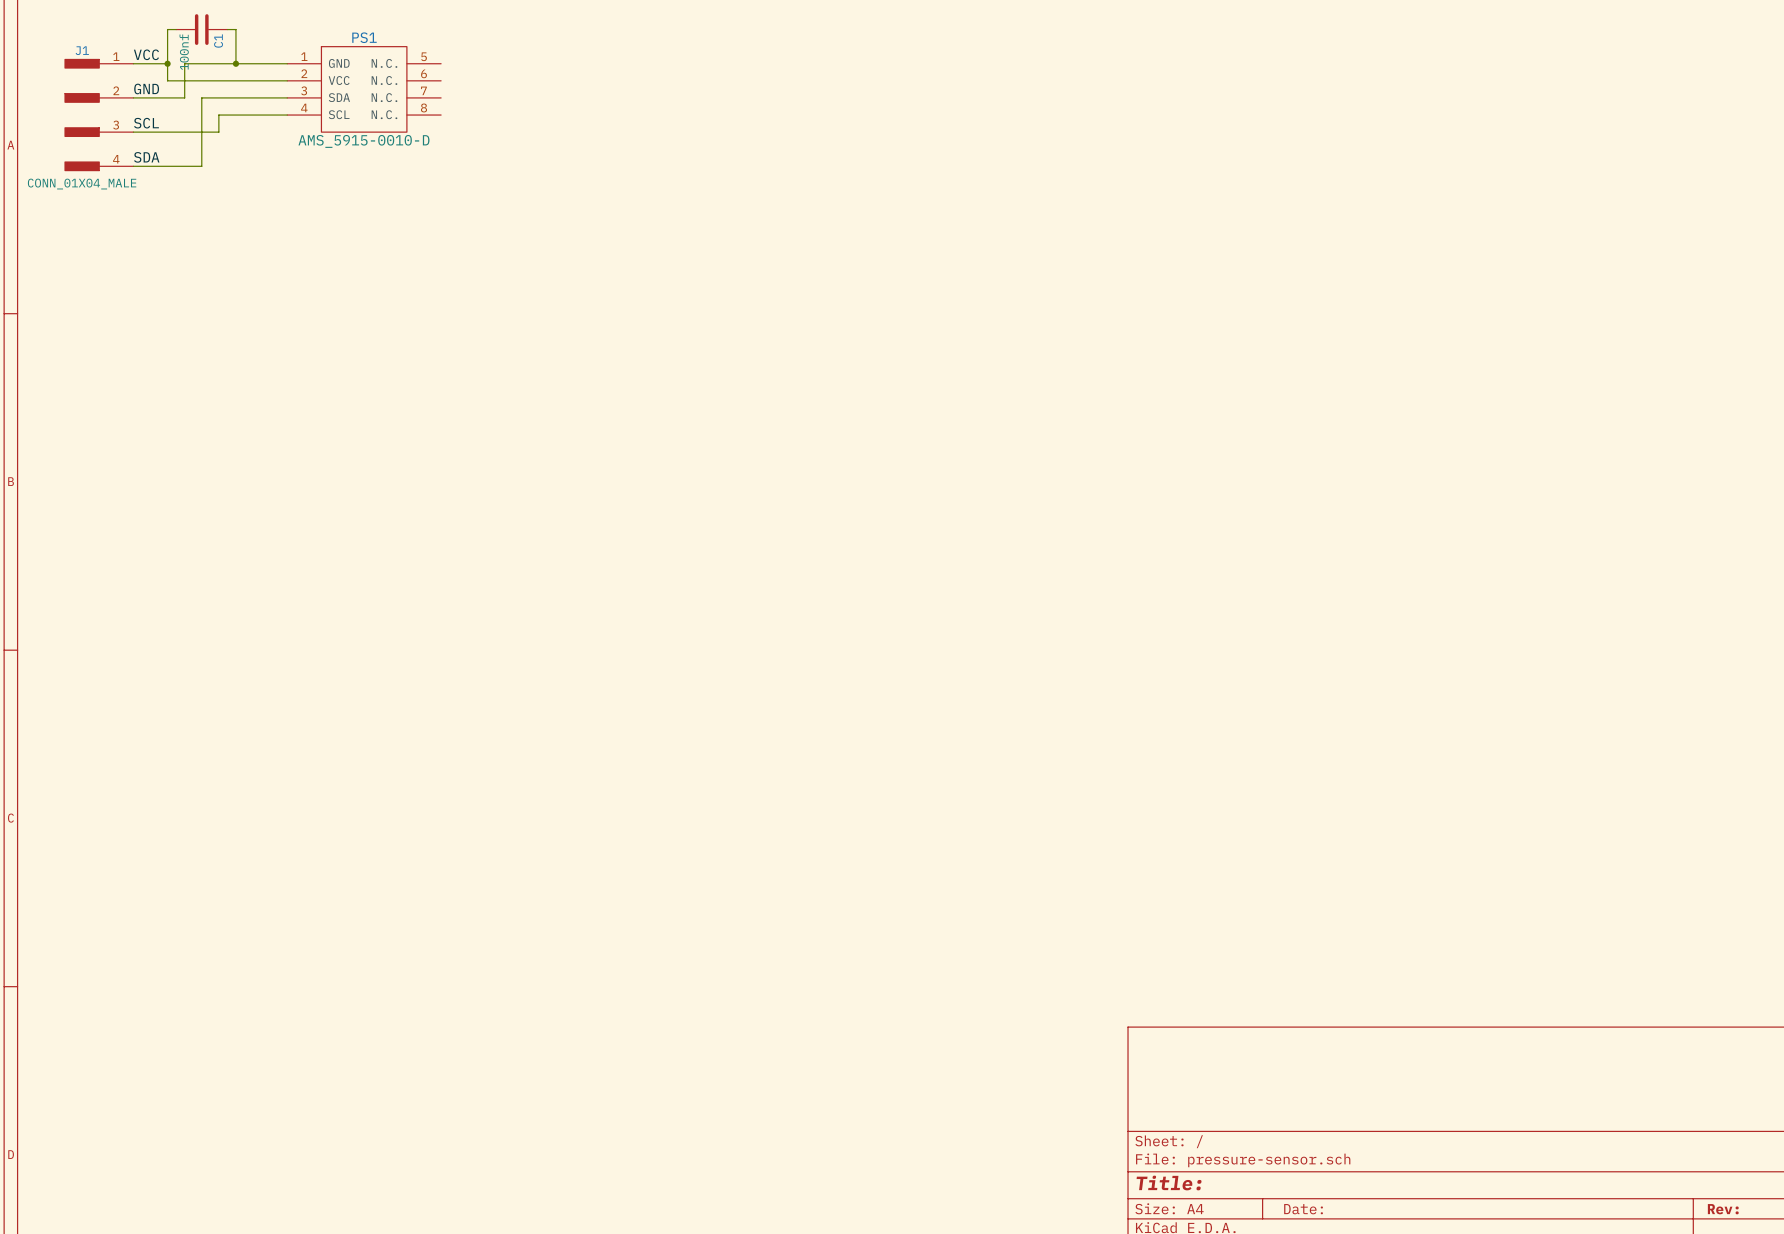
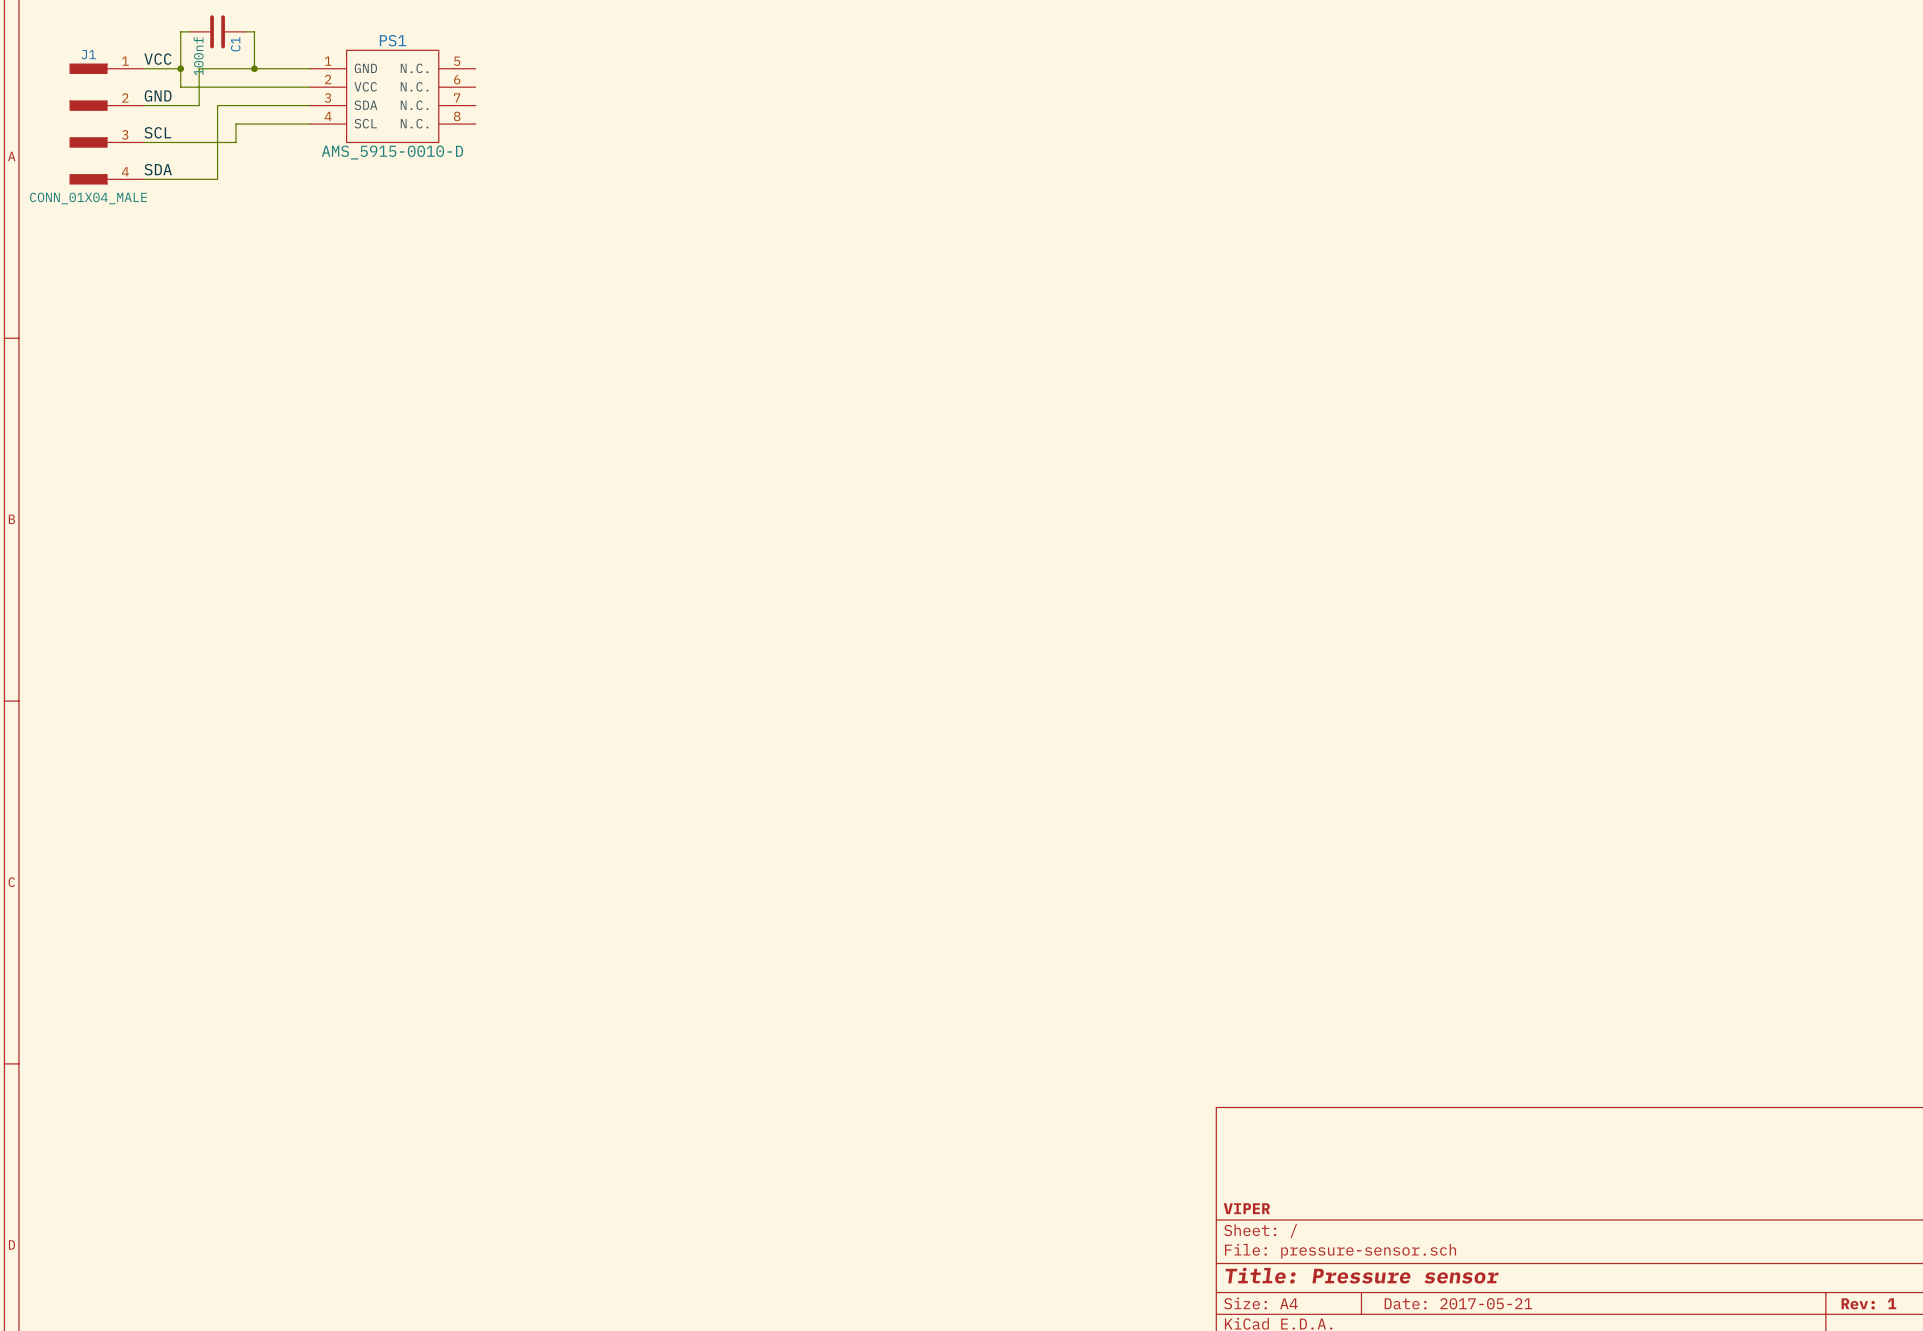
title block: none -> VIPER (1246, 1208)
title block: Title: (1169, 1183) -> Title: Pressure sensor (1362, 1275)
title block: Date: (1303, 1209) -> Date: 2017-05-21 (1458, 1303)
title block: Rev: (1723, 1209) -> Rev: 1 (1868, 1303)

